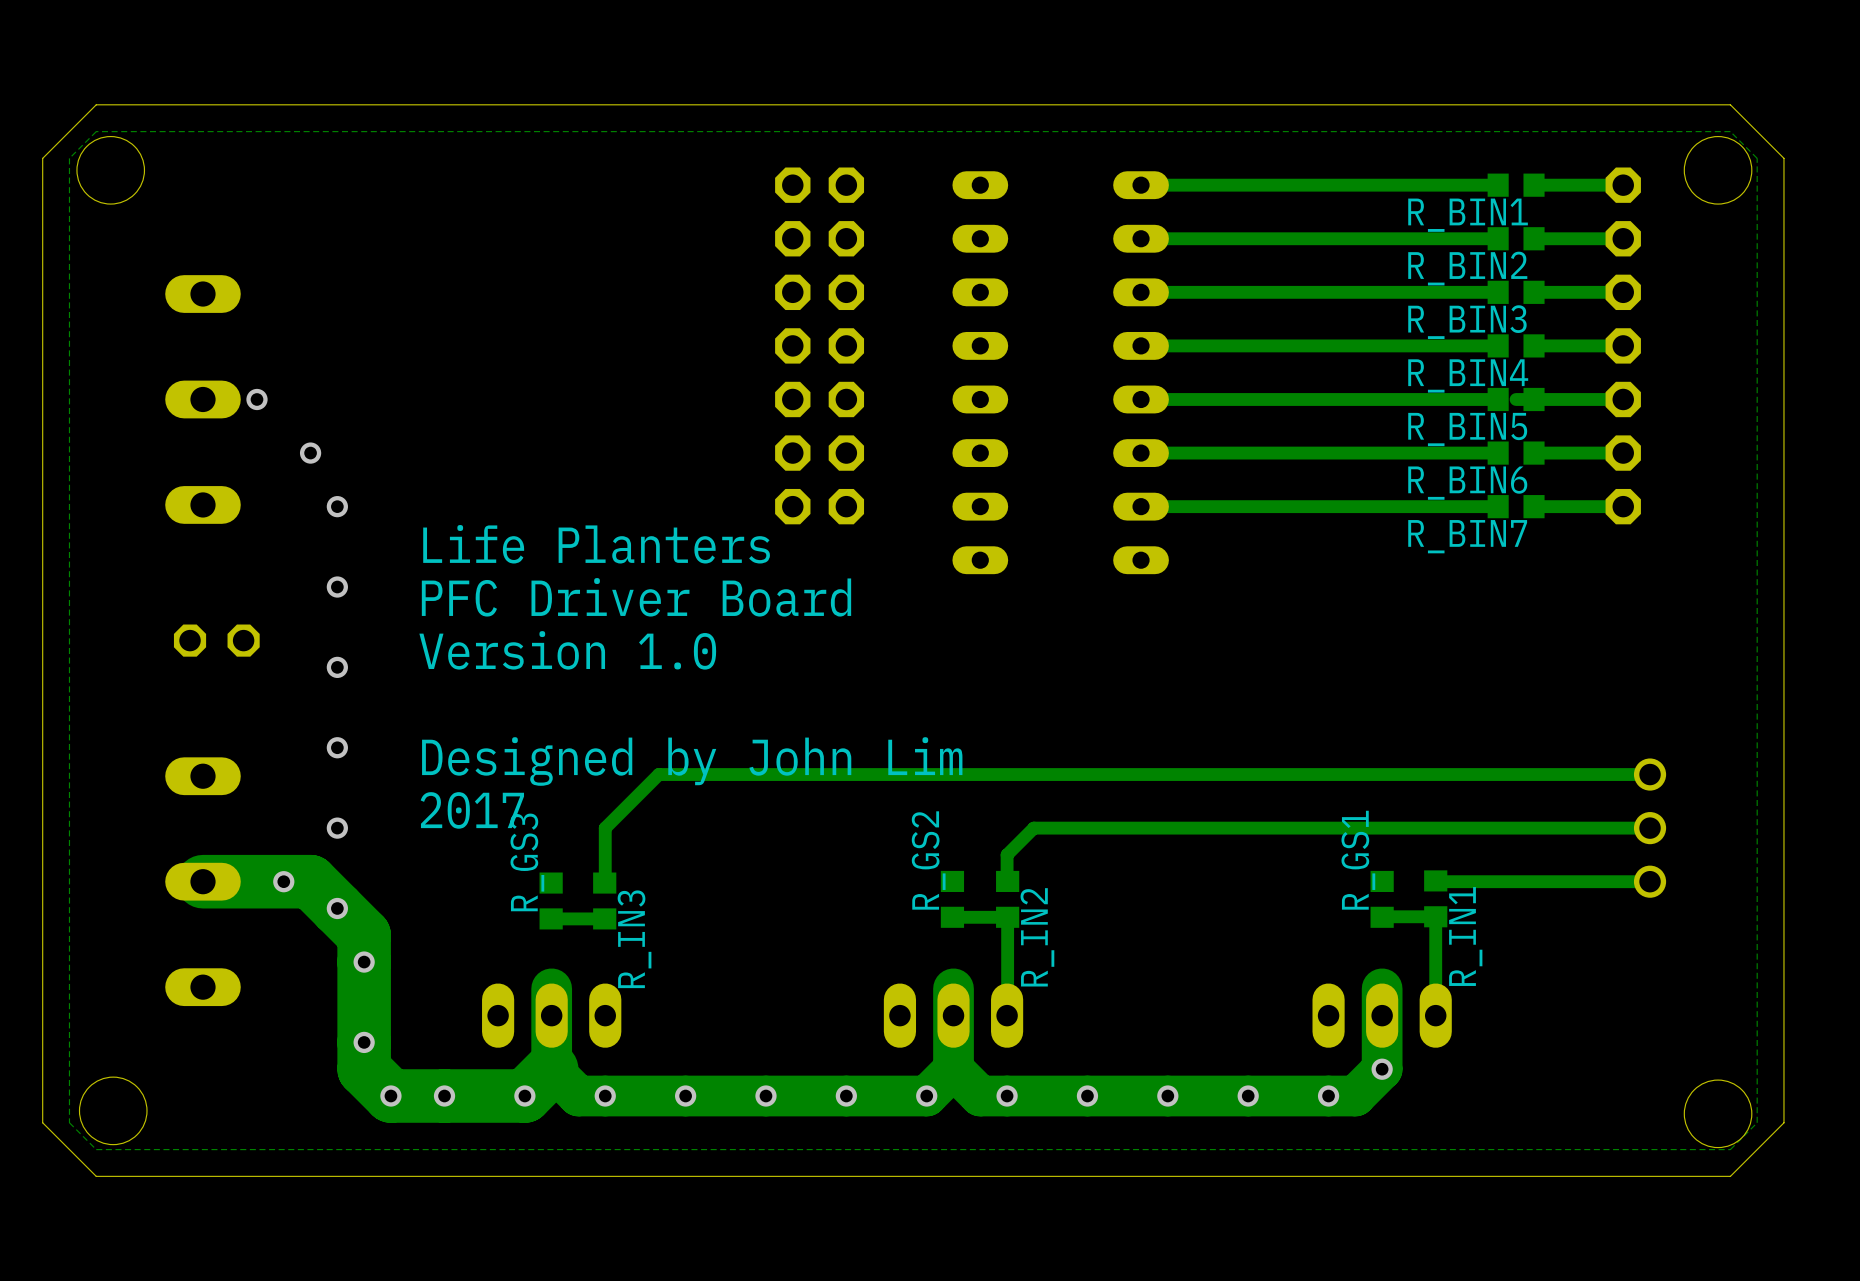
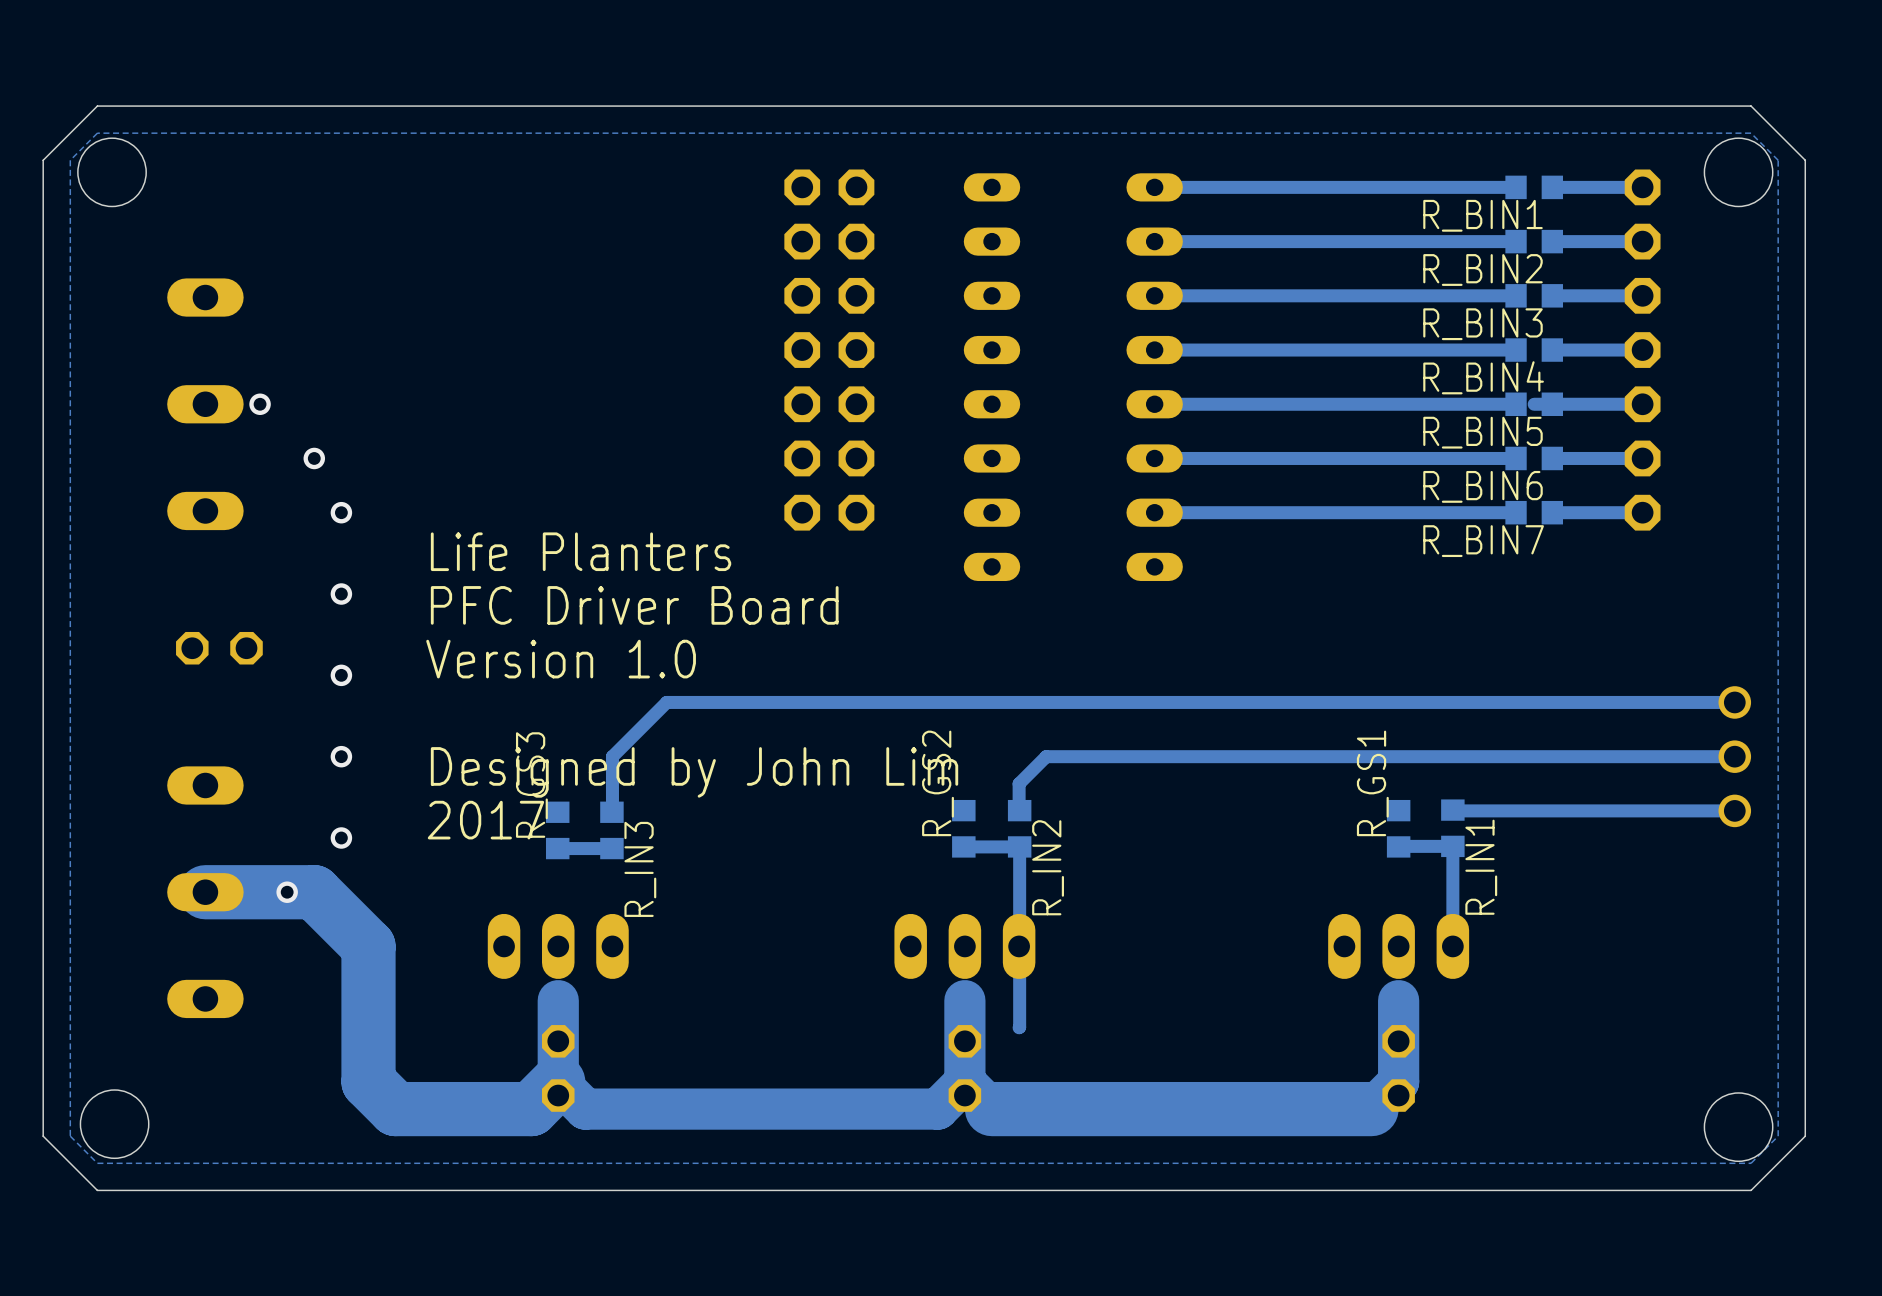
track: none -> (1734, 702) (666, 702) (612, 756) (611, 812)
track: none -> (1734, 756) (1046, 756) (1019, 783) (1019, 810)
track: (1650, 774) (658, 774) (605, 828) (604, 883) -> none
track: none -> (1452, 810) (1734, 810)
track: (1650, 828) (1033, 828) (1007, 854) (1007, 881) -> none
part position: (1650, 828) -> (1734, 756)
track: (1435, 880) (1650, 881) -> none
R_IN1 position: (1435, 898) -> (1452, 828)
R_GS2 position: (952, 899) -> (963, 828)
R_IN2 position: (1007, 899) -> (1019, 828)
R_GS1 position: (1382, 899) -> (1398, 828)
R_GS3 position: (551, 900) -> (557, 830)
R_IN3 position: (604, 900) -> (611, 830)
via: (337, 908) -> none
track: (1435, 916) (1382, 917) -> (1452, 927) (1452, 846) (1398, 846)
track: (1007, 917) (952, 917) -> (1019, 928) (1019, 846) (963, 846)
track: (604, 918) (551, 918) -> (611, 848) (557, 848)
track: (1435, 935) (1435, 1015) -> none
via: (364, 962) -> none
part position: (551, 1015) -> (558, 946)
part position: (953, 1015) -> (964, 946)
part position: (1382, 1015) -> (1398, 946)
via: (364, 1042) -> none
part: none -> (558, 1068)
part: none -> (964, 1068)
part: none -> (1398, 1068)
via: (1382, 1069) -> none
via: (390, 1096) -> none
via: (444, 1096) -> none
via: (524, 1096) -> none
via: (605, 1096) -> none
via: (685, 1096) -> none
via: (765, 1096) -> none
via: (846, 1096) -> none
via: (926, 1096) -> none
via: (1007, 1096) -> none
via: (1087, 1096) -> none
via: (1167, 1096) -> none
via: (1248, 1096) -> none
via: (1328, 1096) -> none
track width: thin (1355, 1096) (980, 1096) -> thick (1371, 1109) (992, 1109)

